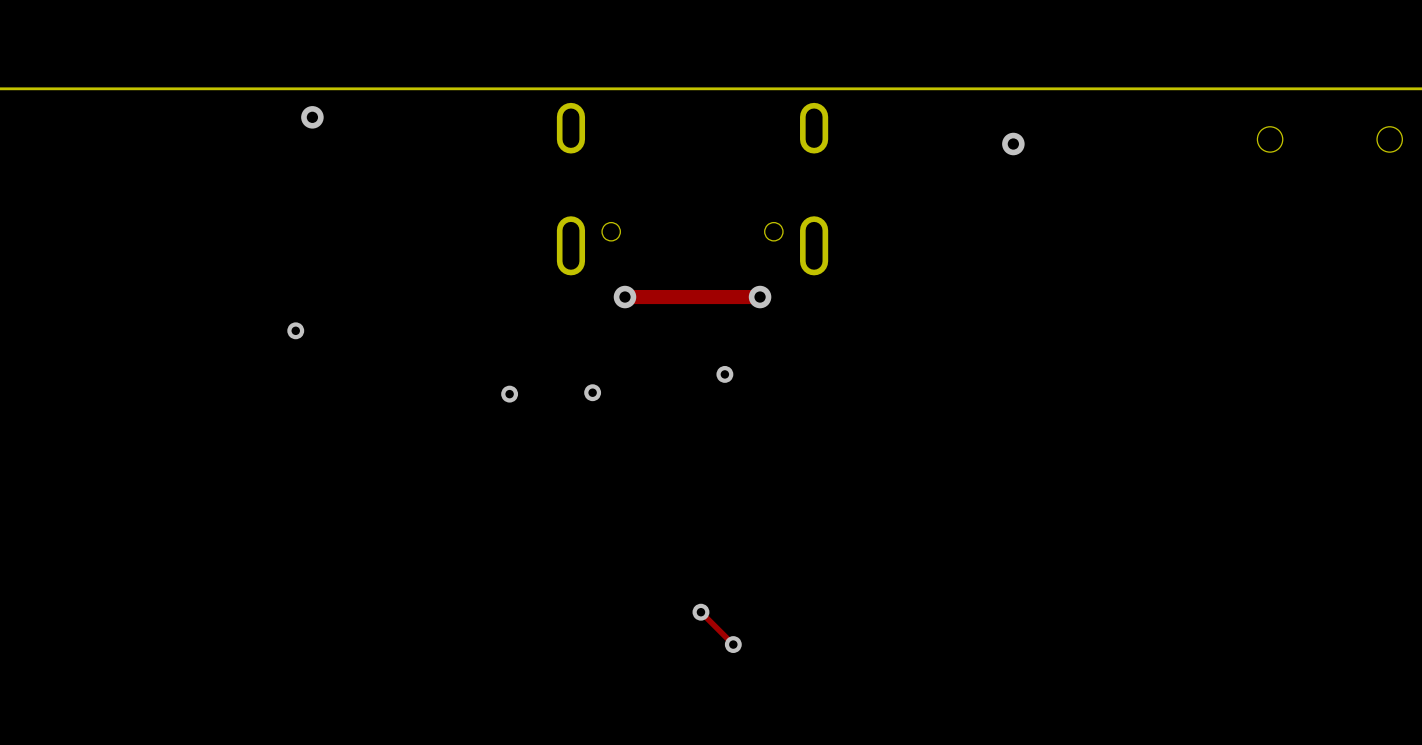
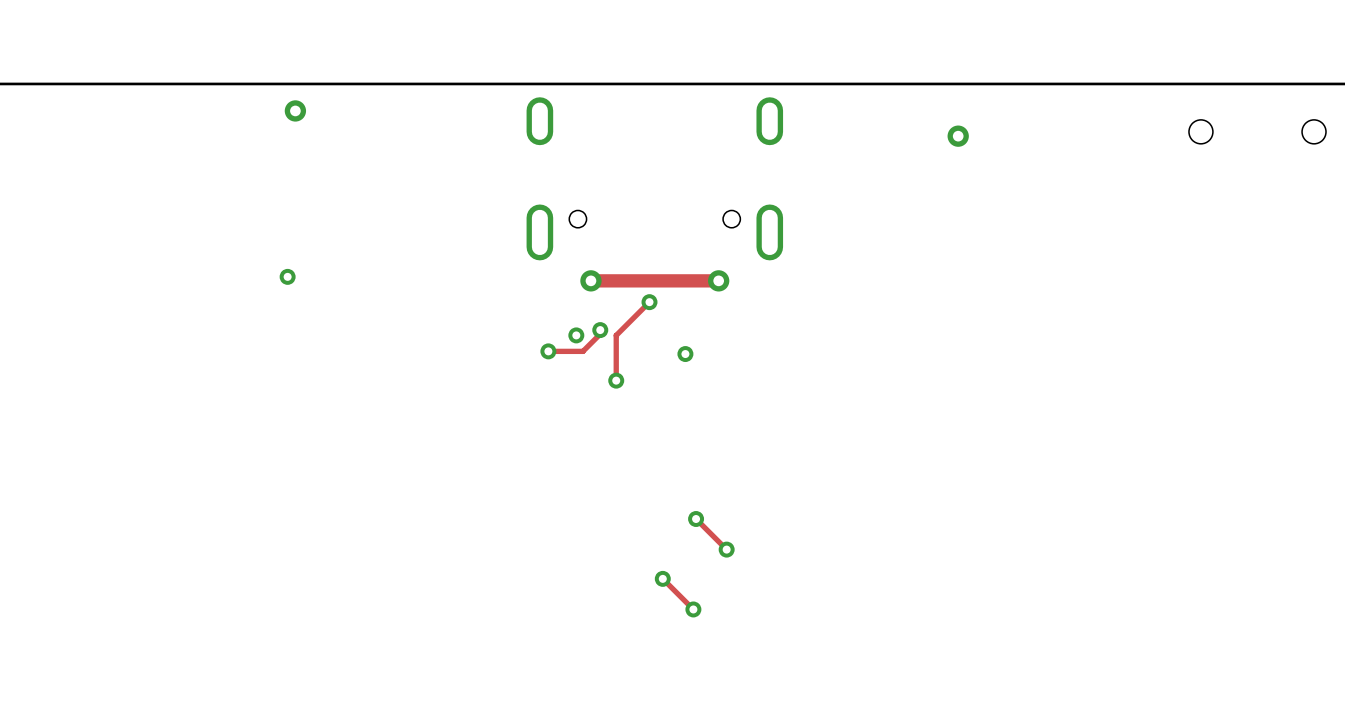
track: none -> (649, 302) (616, 335) (616, 380)
via: none -> (649, 302)
via position: (295, 330) -> (287, 276)
track: none -> (600, 330) (600, 334) (582, 351) (548, 351)
via: none -> (600, 330)
via: none -> (576, 335)
via: none -> (548, 351)
via: (592, 392) -> none
via: (509, 394) -> none
via: none -> (616, 380)
track: none -> (696, 519) (726, 549)
via: none -> (696, 519)
via: none -> (726, 549)

